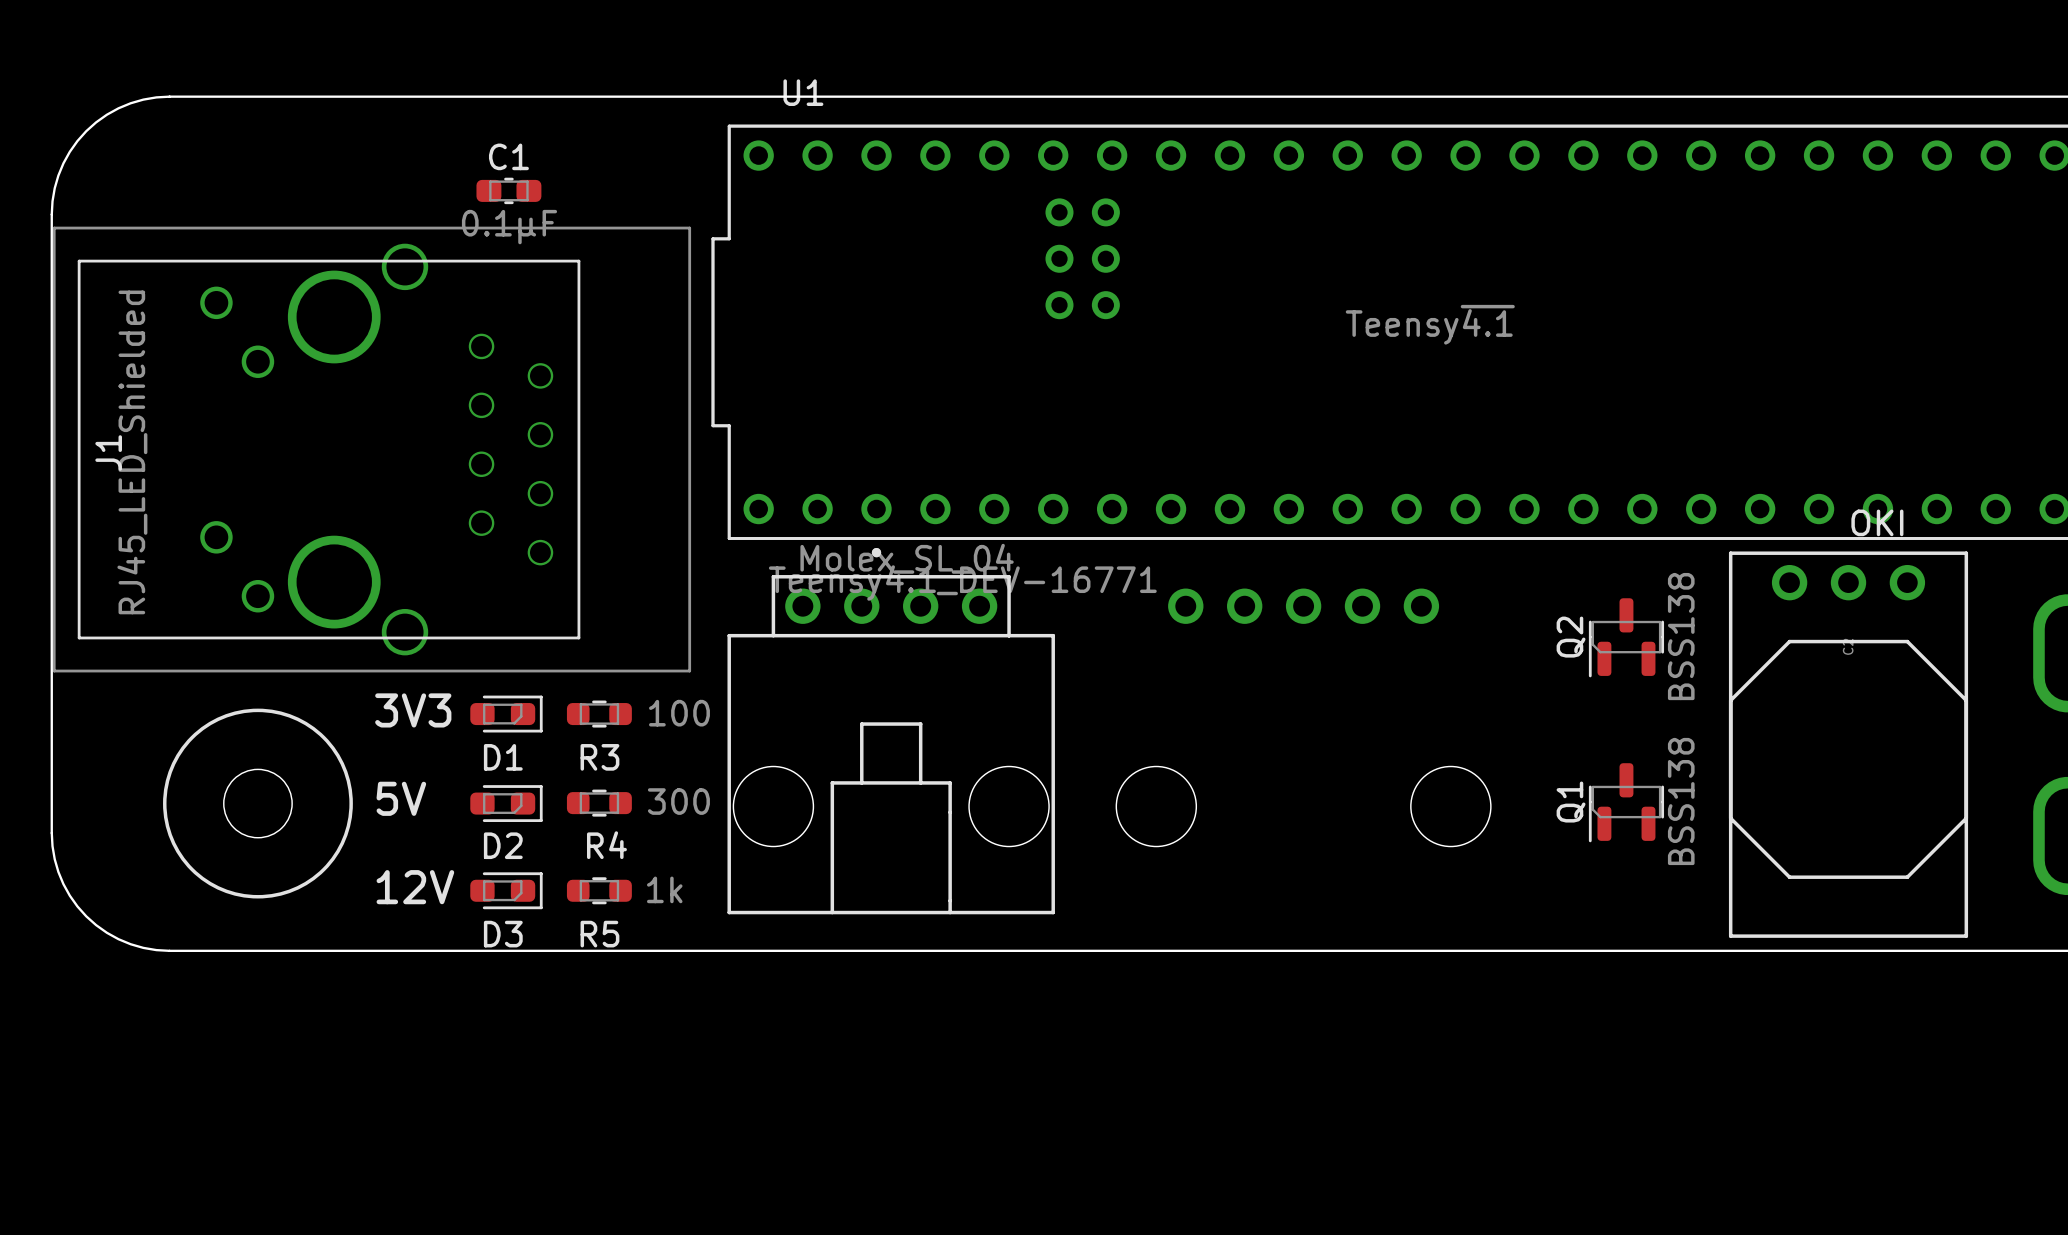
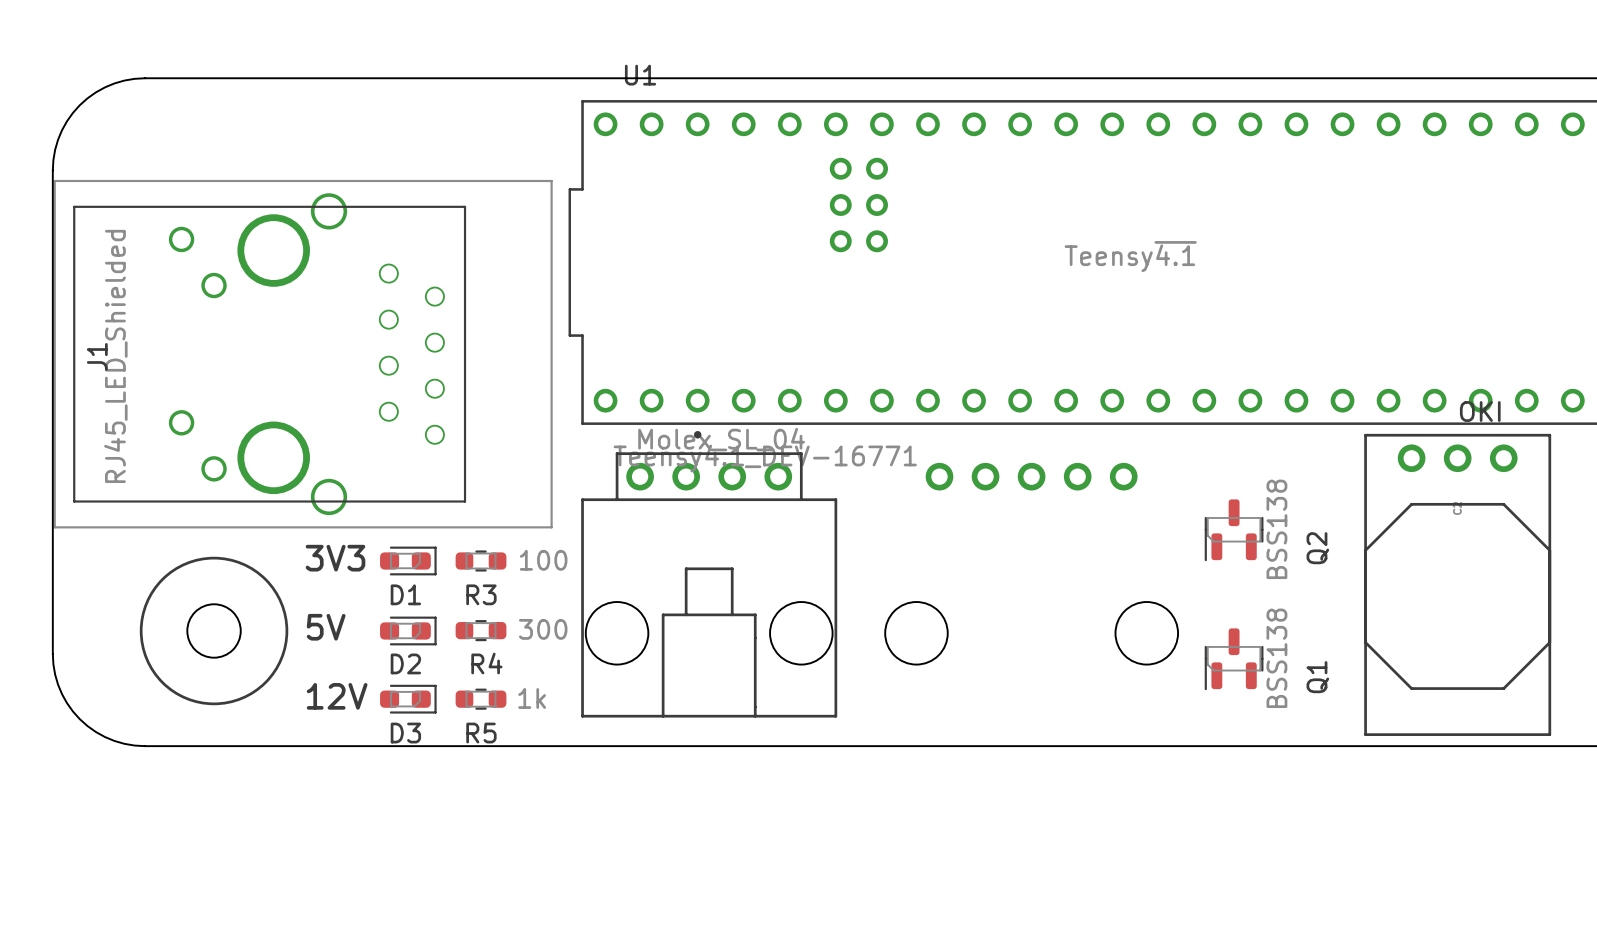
C1: 0.1µF (508, 190) -> none
Q2 name position: Q2 (1571, 637) -> Q2 (1317, 548)
Q2 position: (1626, 637) -> (1234, 530)
Q1 name position: Q1 (1571, 802) -> Q1 (1317, 677)
Q1 position: (1626, 802) -> (1234, 659)

